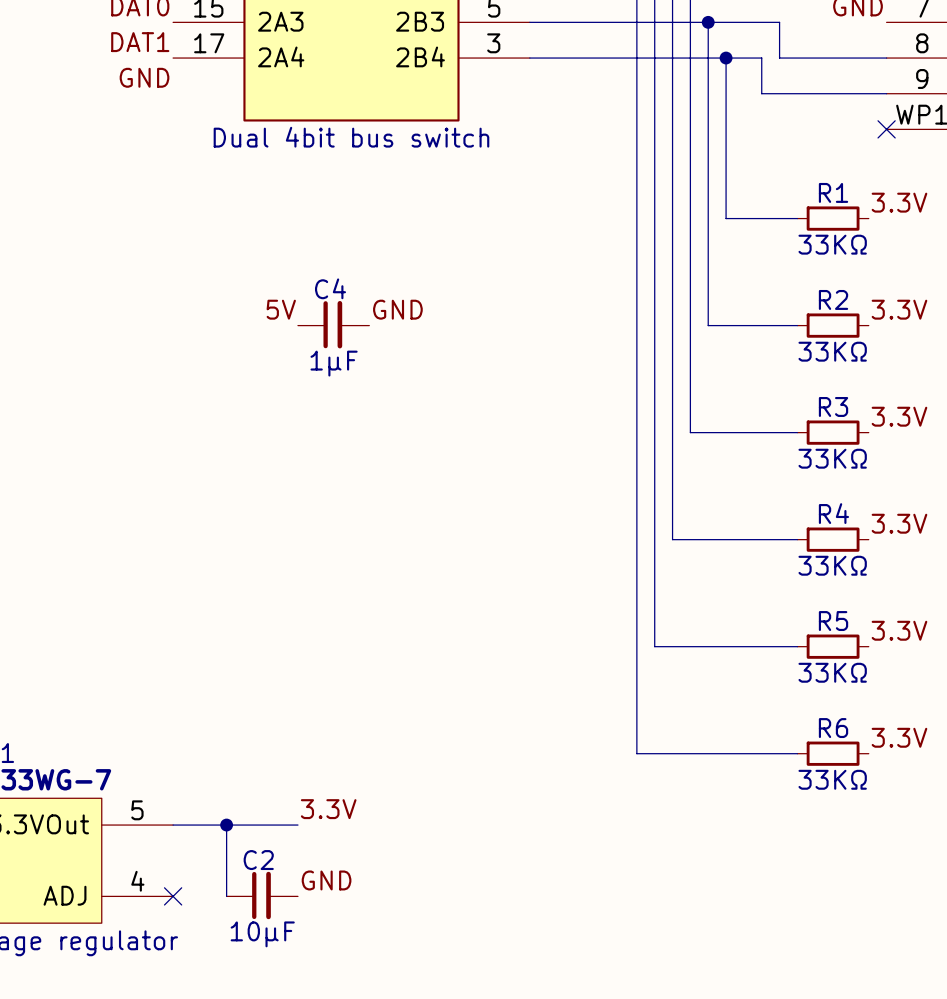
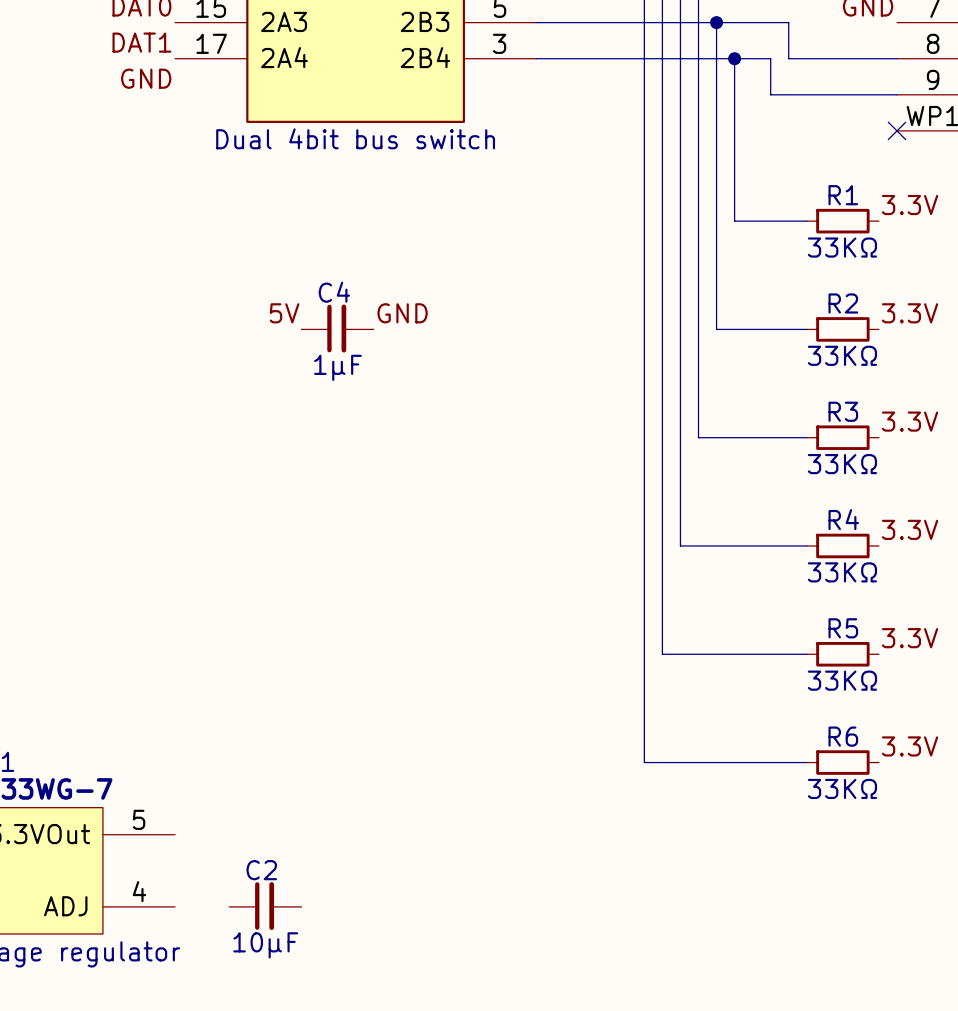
label: 3.3V (328, 809) -> none
wire: (173, 825) (297, 825) -> none
wire: (226, 825) (226, 896) -> none
junction: (226, 825) -> none
label: GND (326, 880) -> none
no-connect mark: (173, 896) -> none

